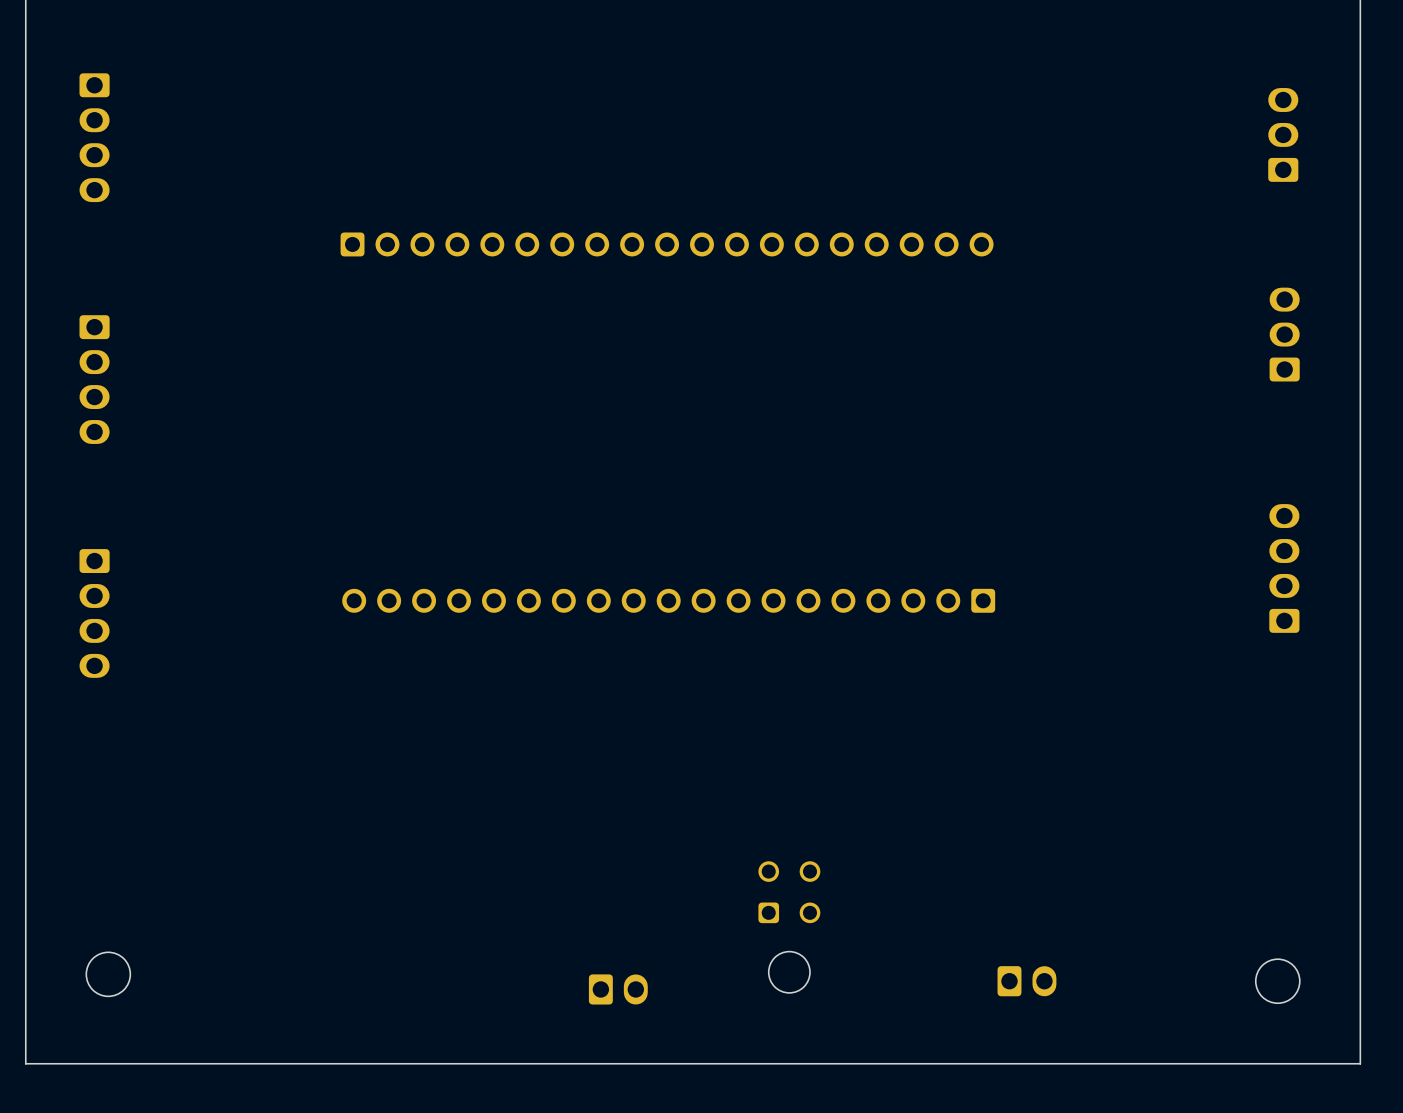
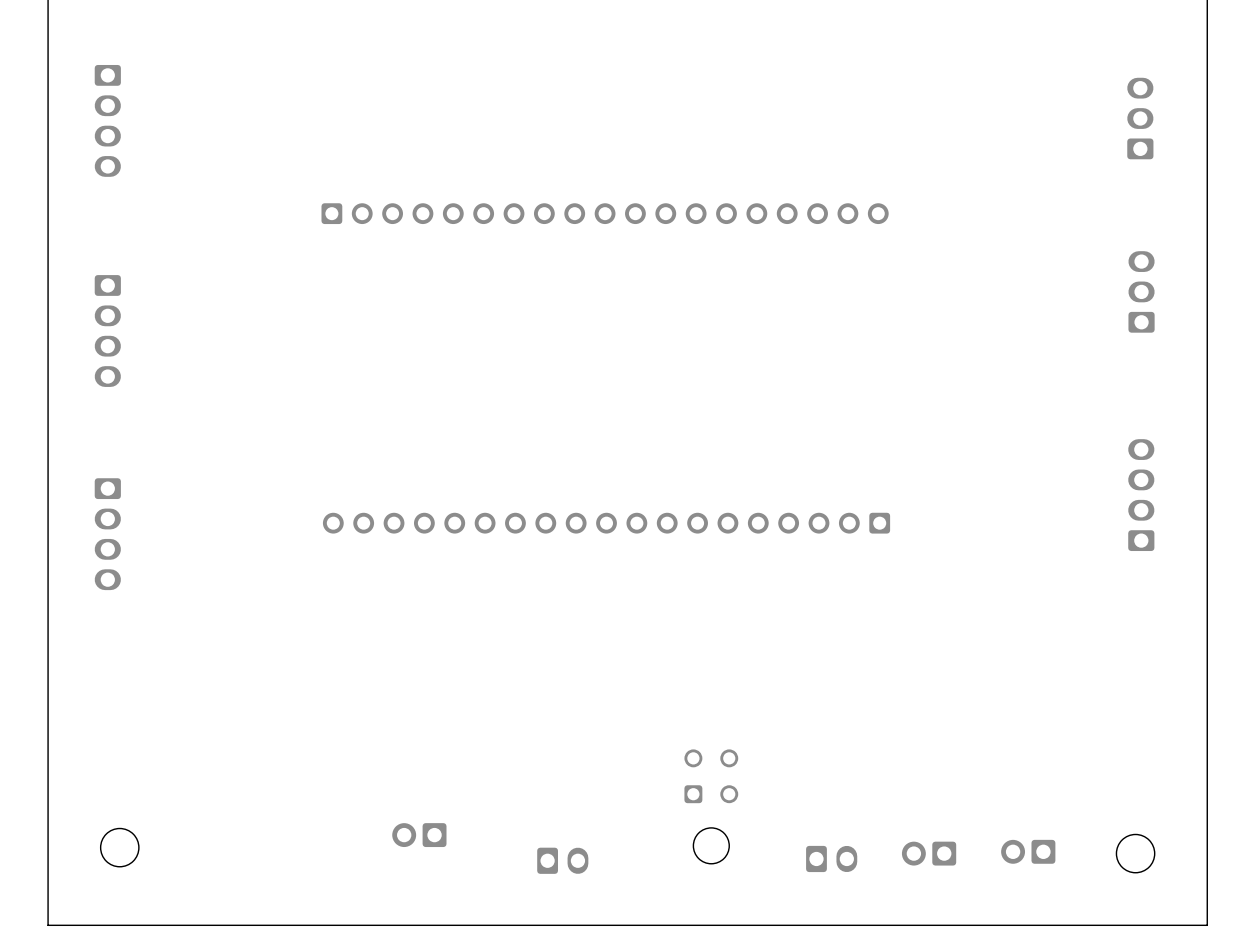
part: none -> (419, 835)
part footprint: [997, 966, 1057, 997] -> [901, 841, 957, 866]
part: none -> (1028, 851)
part: none -> (831, 858)

